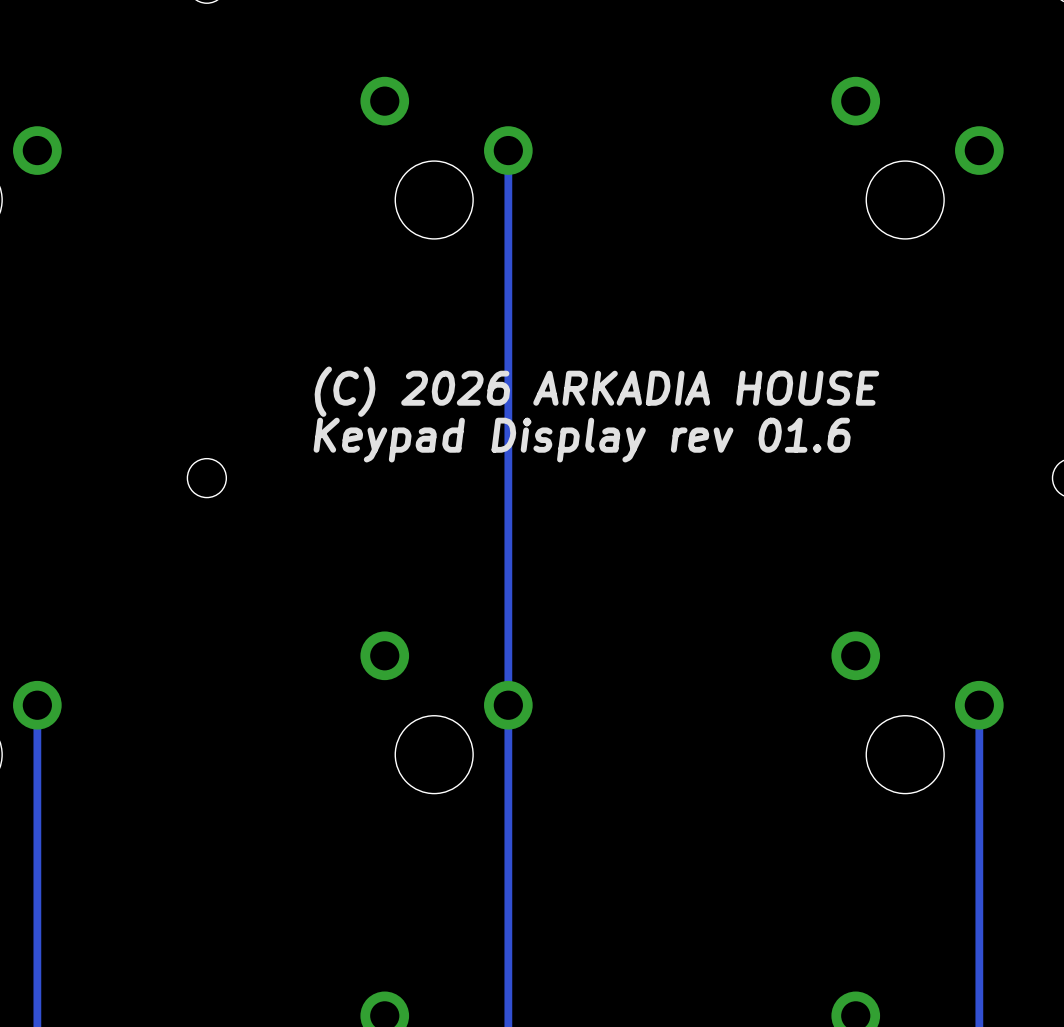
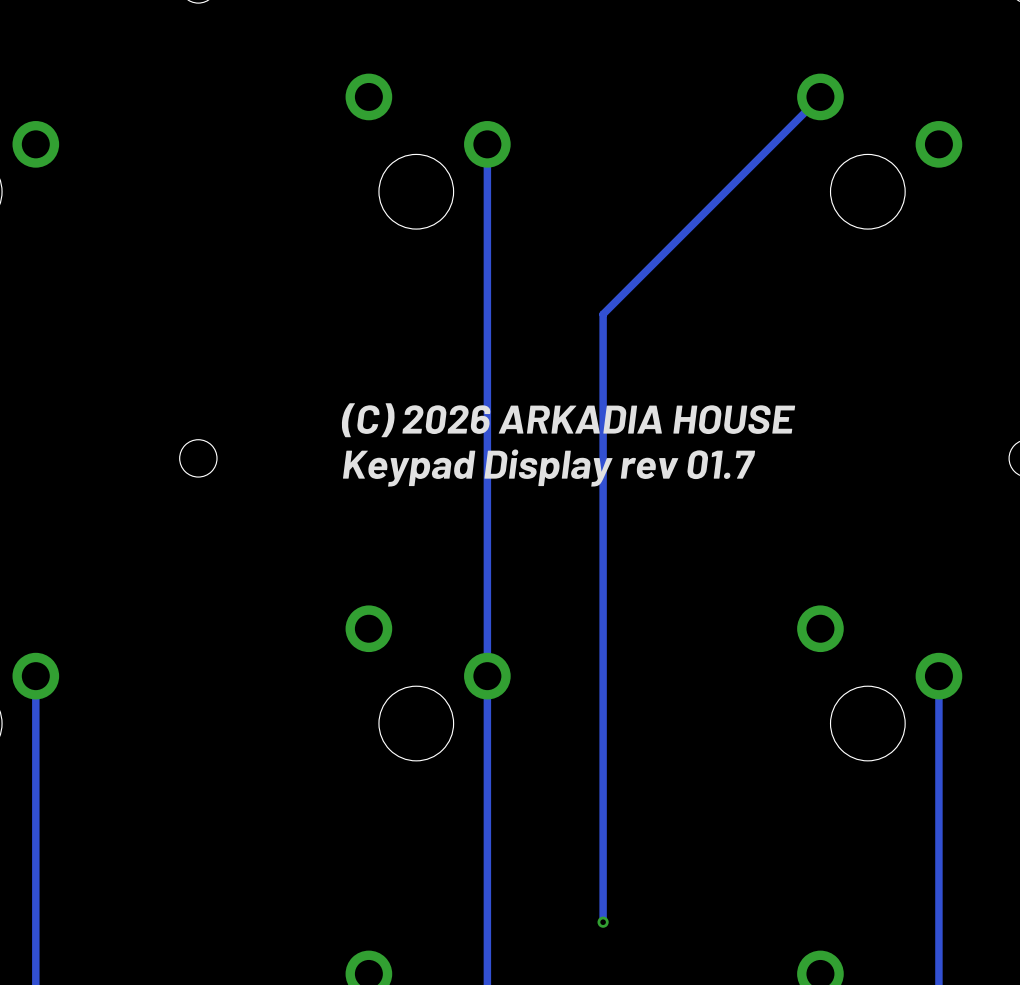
track: none -> (820, 96) (603, 314) (603, 922)
text position: (C) 2026 ARKADIA HOUSE (596, 391) -> (C) 2026 ARKADIA HOUSE (568, 420)
text: Keypad Display rev 01.6 (582, 440) -> Keypad Display rev 01.7 (549, 468)
via: none -> (603, 922)

